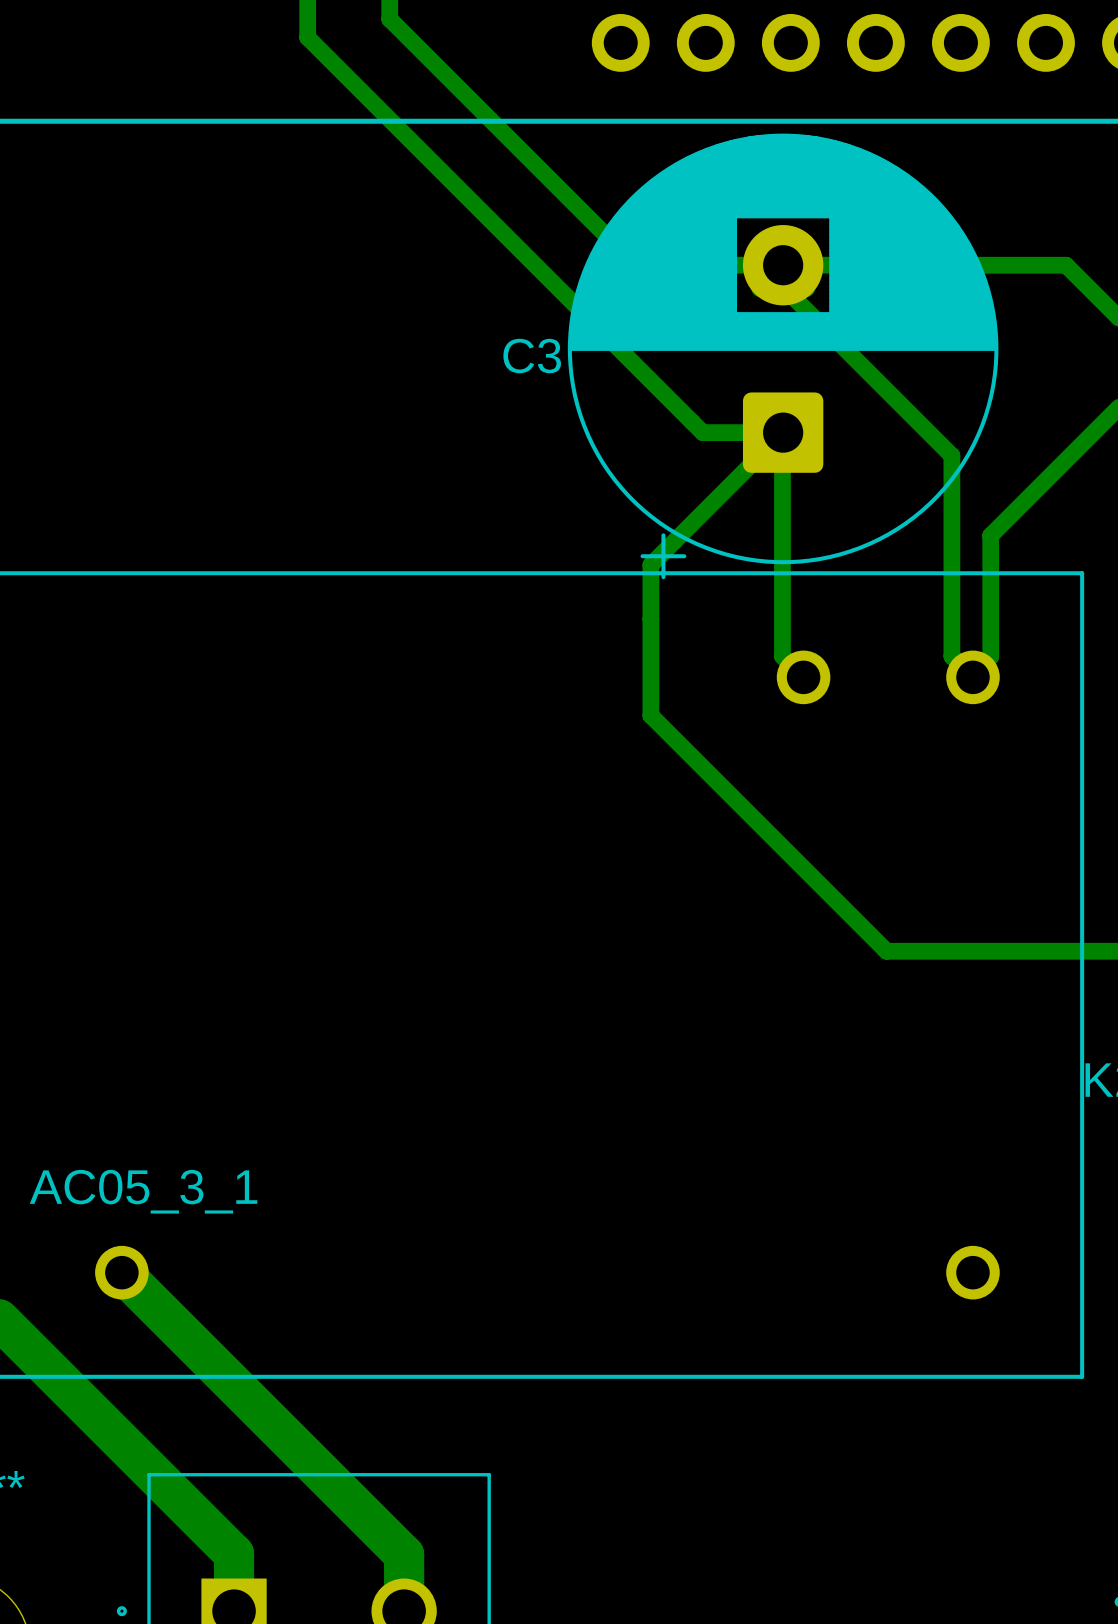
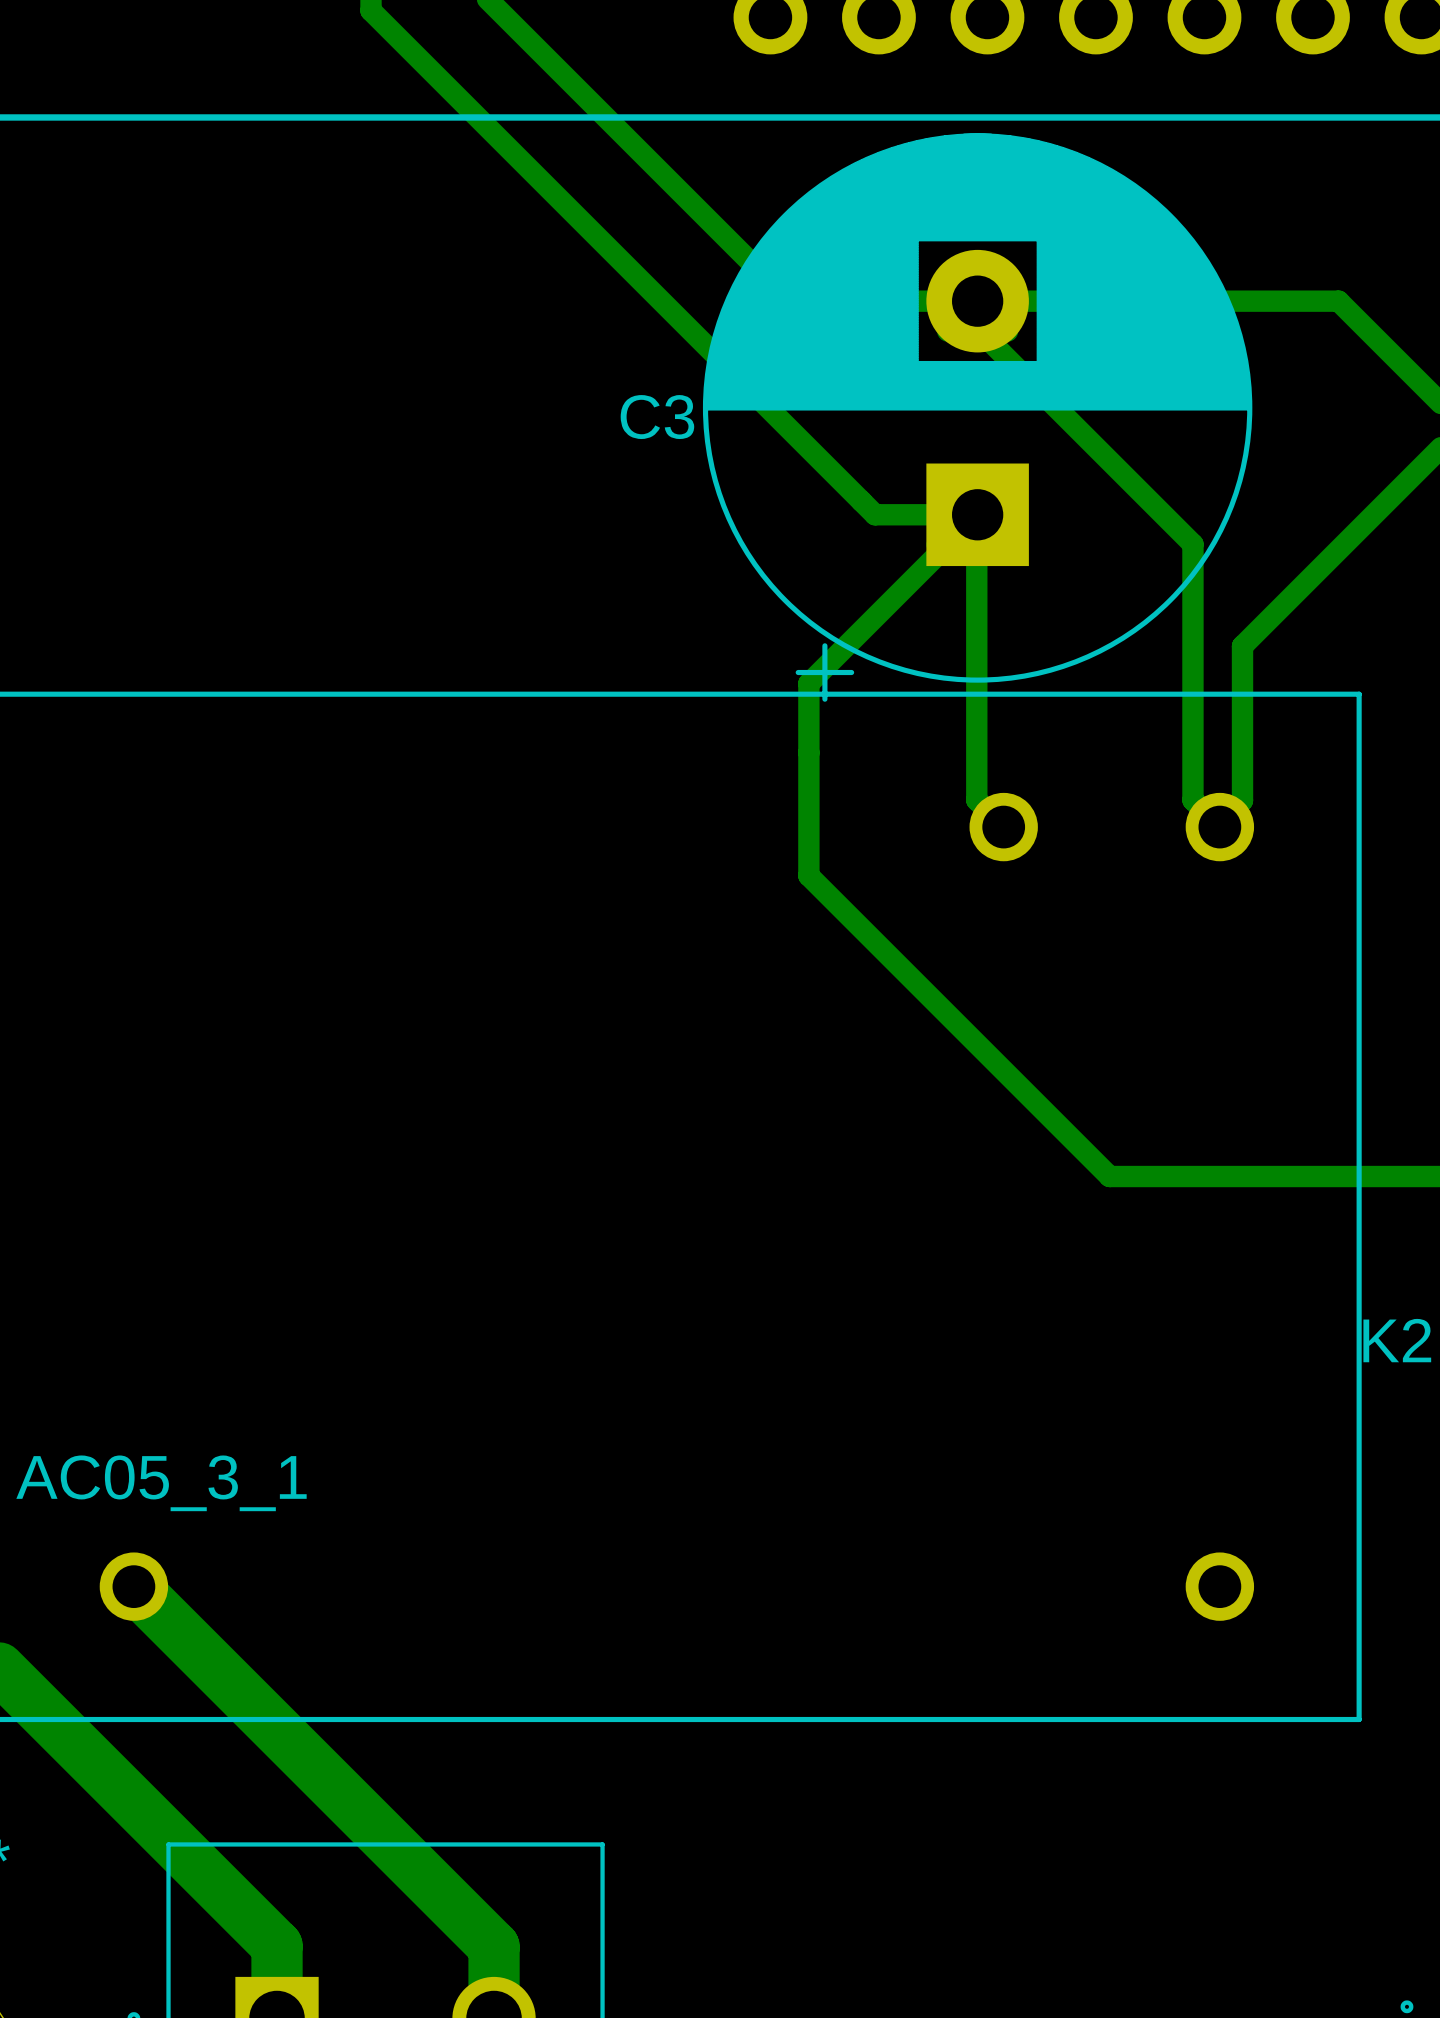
C3 footprint: [567, 133, 999, 580] -> [702, 133, 1253, 702]

